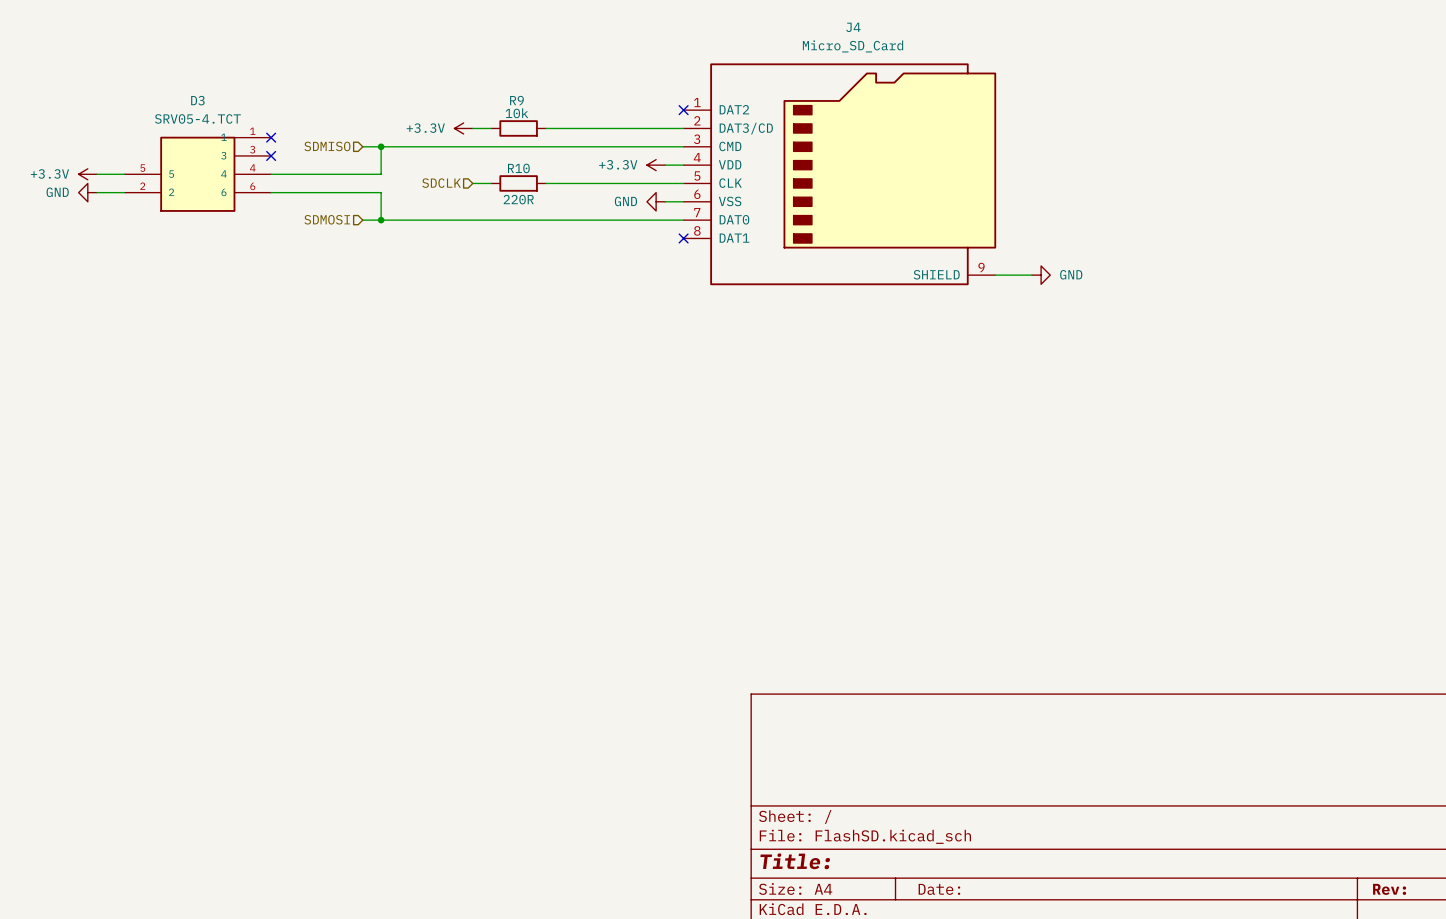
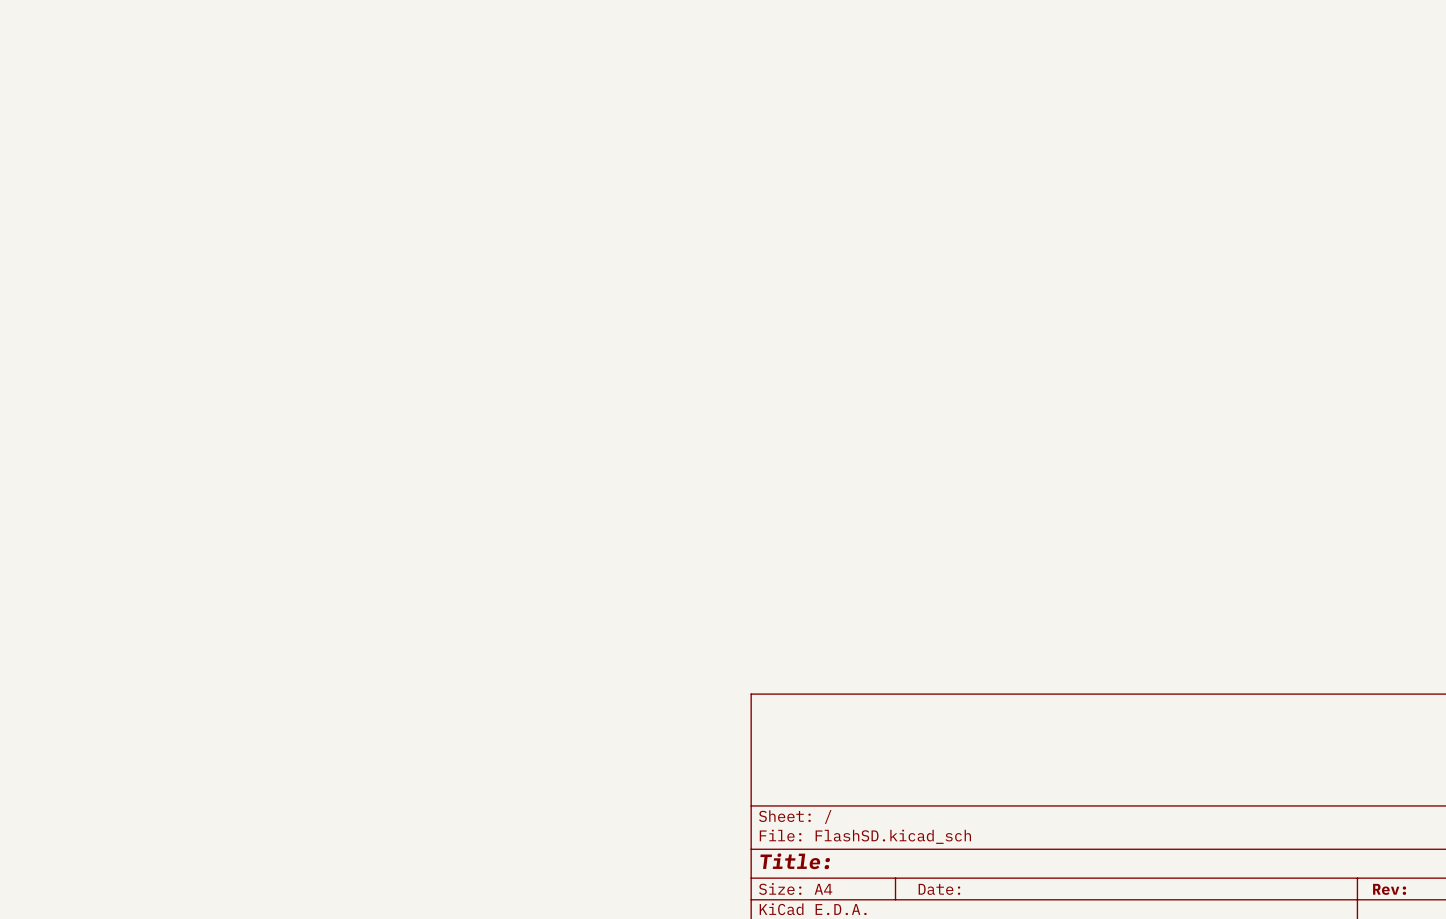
no-connect mark: (683, 110) -> none
power symbol: +3.3V (463, 128) -> none
wire: (472, 128) (491, 128) -> none
R9: 10k (518, 128) -> none
wire: (546, 128) (683, 128) -> none
no-connect mark: (271, 137) -> none
hierarchical label: SDMISO (327, 146) -> none
wire: (362, 146) (683, 146) -> none
wire: (381, 146) (381, 174) (271, 174) -> none
junction: (381, 146) -> none
no-connect mark: (271, 155) -> none
power symbol: +3.3V (656, 165) -> none
wire: (665, 165) (683, 165) -> none
power symbol: +3.3V (87, 174) -> none
wire: (96, 174) (124, 174) -> none
D3: SRV05-4.TCT (197, 174) -> none
J4: Micro_SD_Card (839, 174) -> none
hierarchical label: SDCLK (441, 183) -> none
wire: (472, 183) (491, 183) -> none
R10: 220R (518, 183) -> none
wire: (546, 183) (683, 183) -> none
power symbol: GND (87, 192) -> none
wire: (96, 192) (124, 192) -> none
wire: (271, 192) (381, 192) (381, 220) -> none
power symbol: GND (656, 201) -> none
wire: (665, 201) (683, 201) -> none
hierarchical label: SDMOSI (327, 219) -> none
wire: (362, 220) (683, 220) -> none
junction: (381, 220) -> none
no-connect mark: (683, 238) -> none
wire: (995, 275) (1031, 275) -> none
power symbol: GND (1041, 275) -> none

